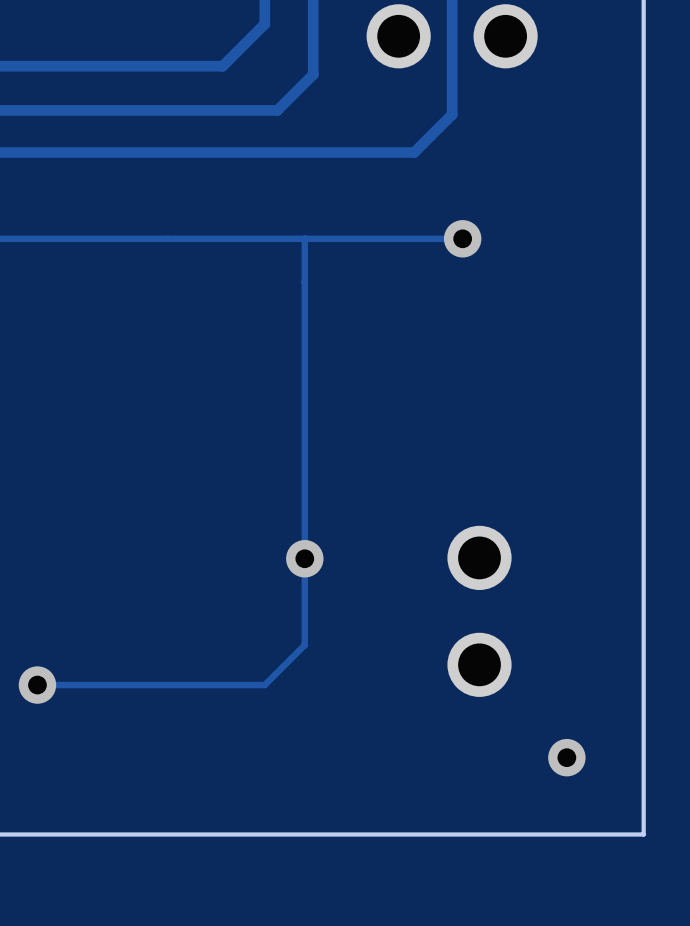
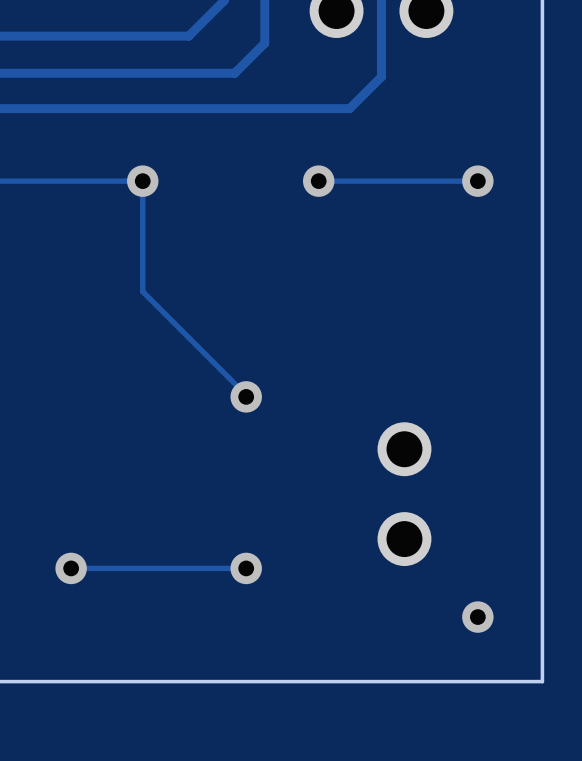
via: none -> (142, 181)
track: (304, 238) (304, 645) (264, 685) (37, 685) -> none
track: (377, 238) (167, 238) -> (246, 396) (142, 291) (142, 181)
via: none -> (318, 181)
via: (462, 238) -> none
track: none -> (477, 181) (390, 181)
via: none -> (477, 181)
via position: (304, 558) -> (246, 396)
via: (37, 685) -> none
track: none -> (244, 566) (246, 568) (71, 568)
via: none -> (71, 568)
via: none -> (246, 568)

